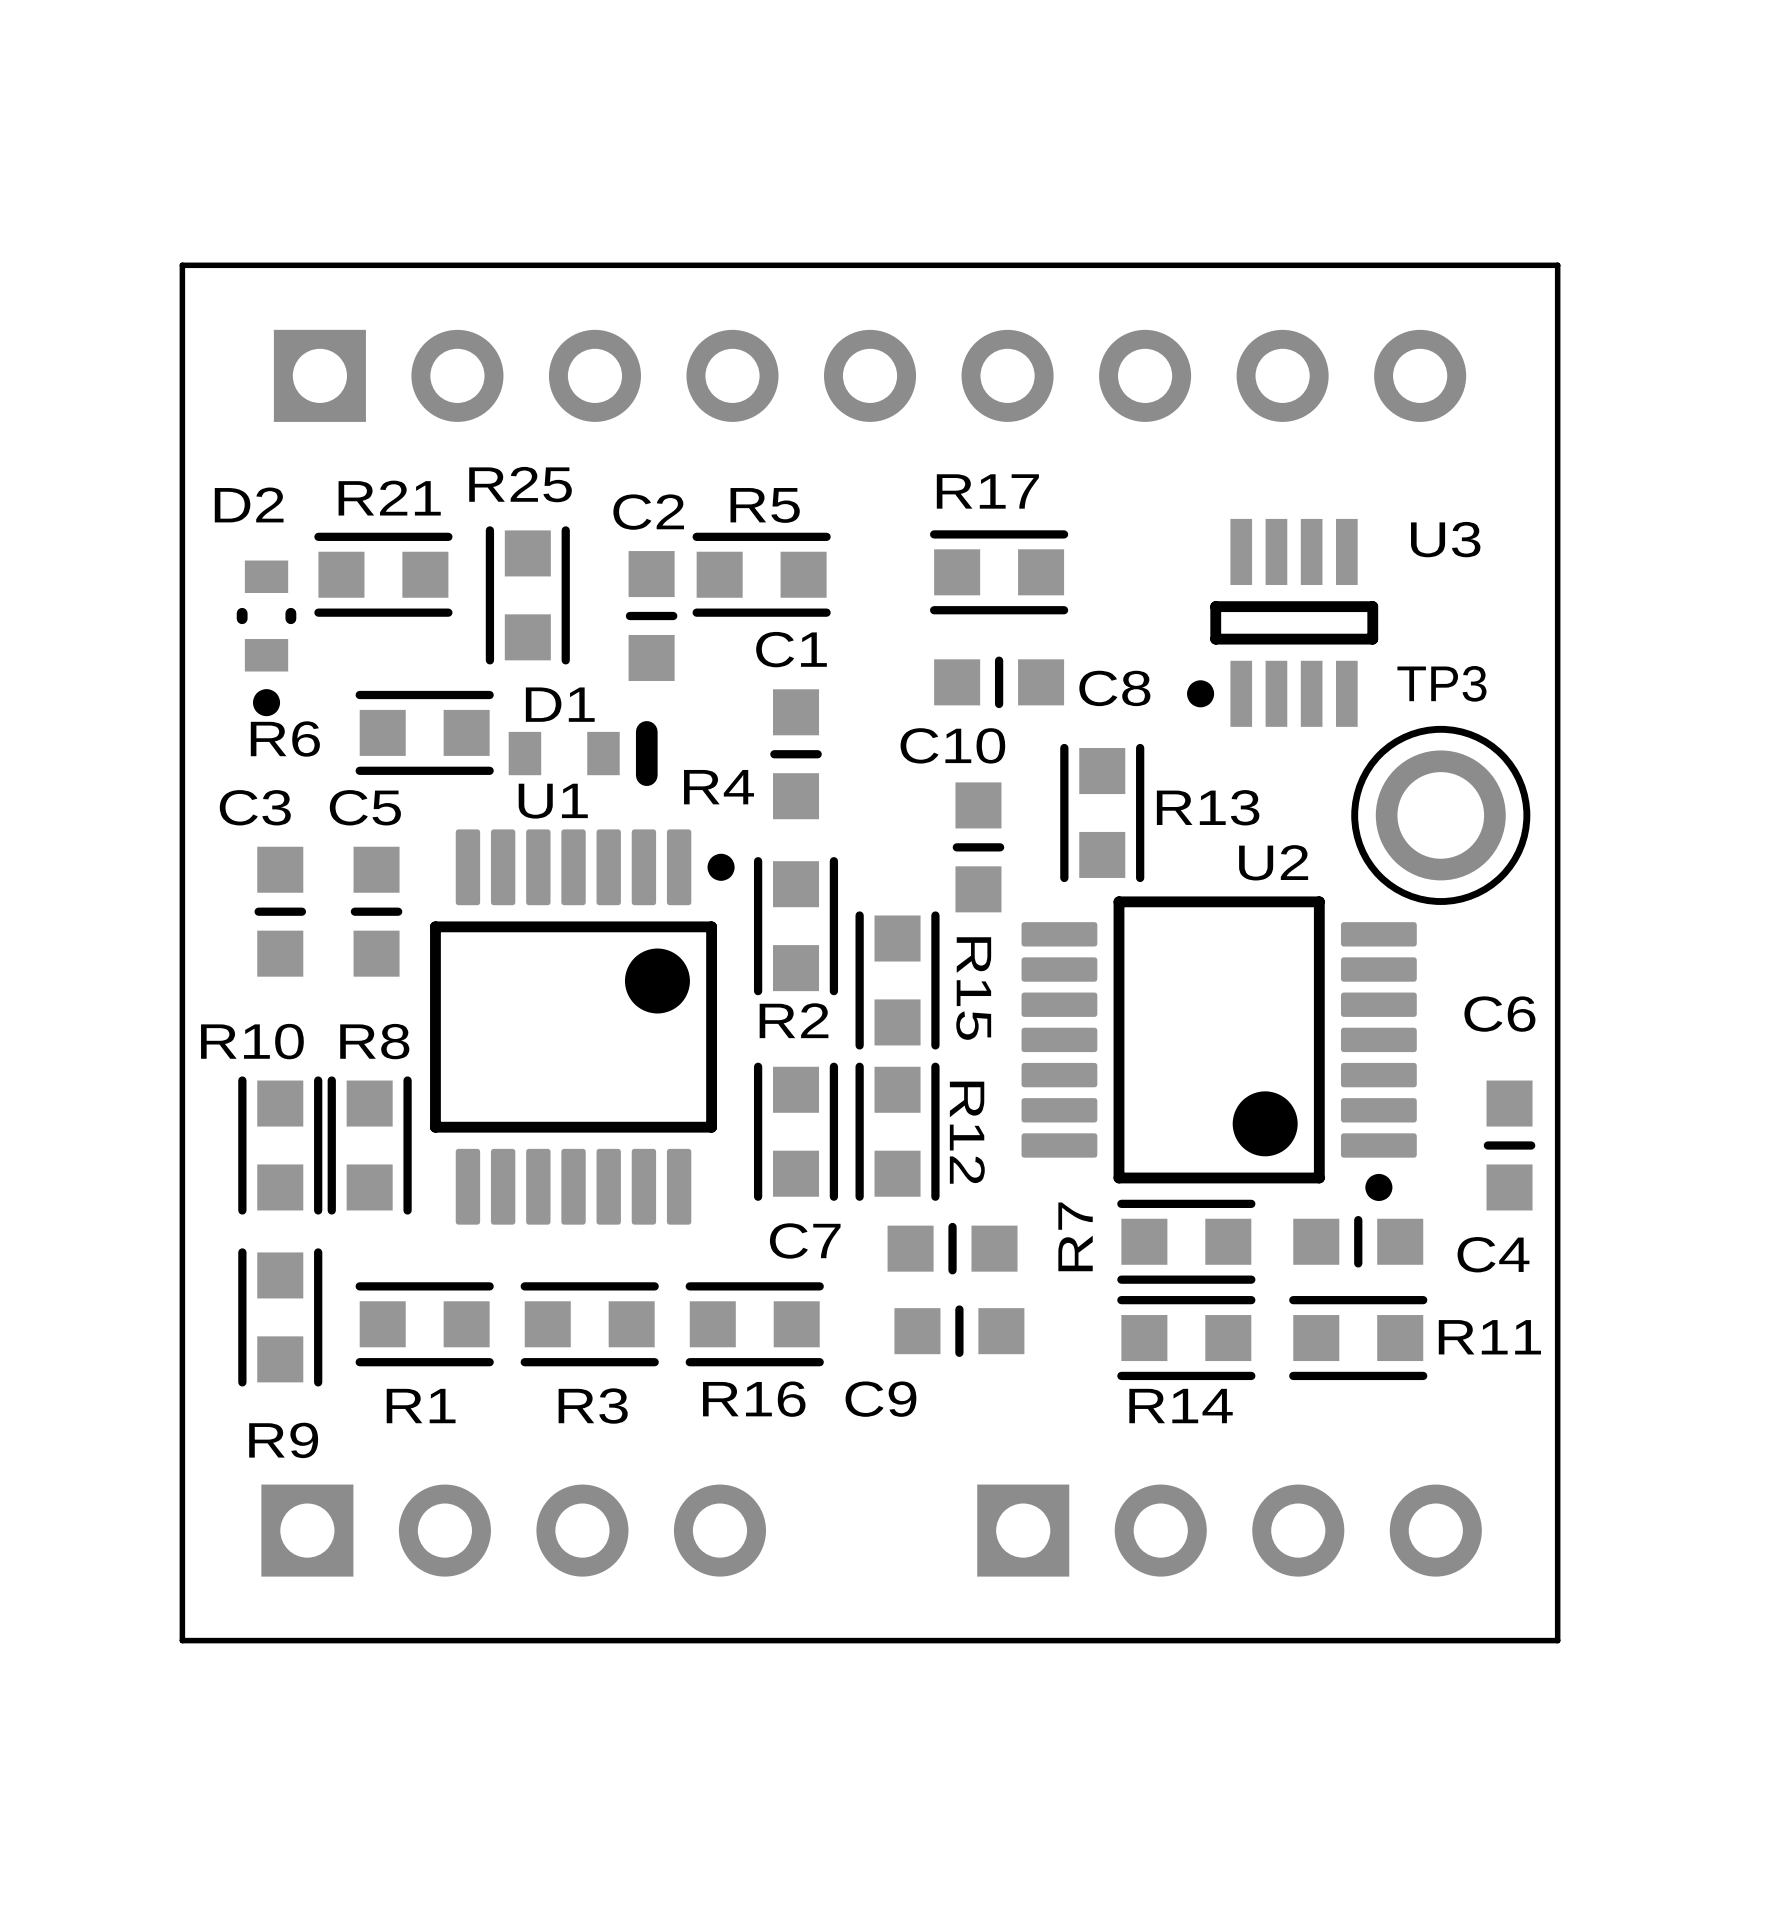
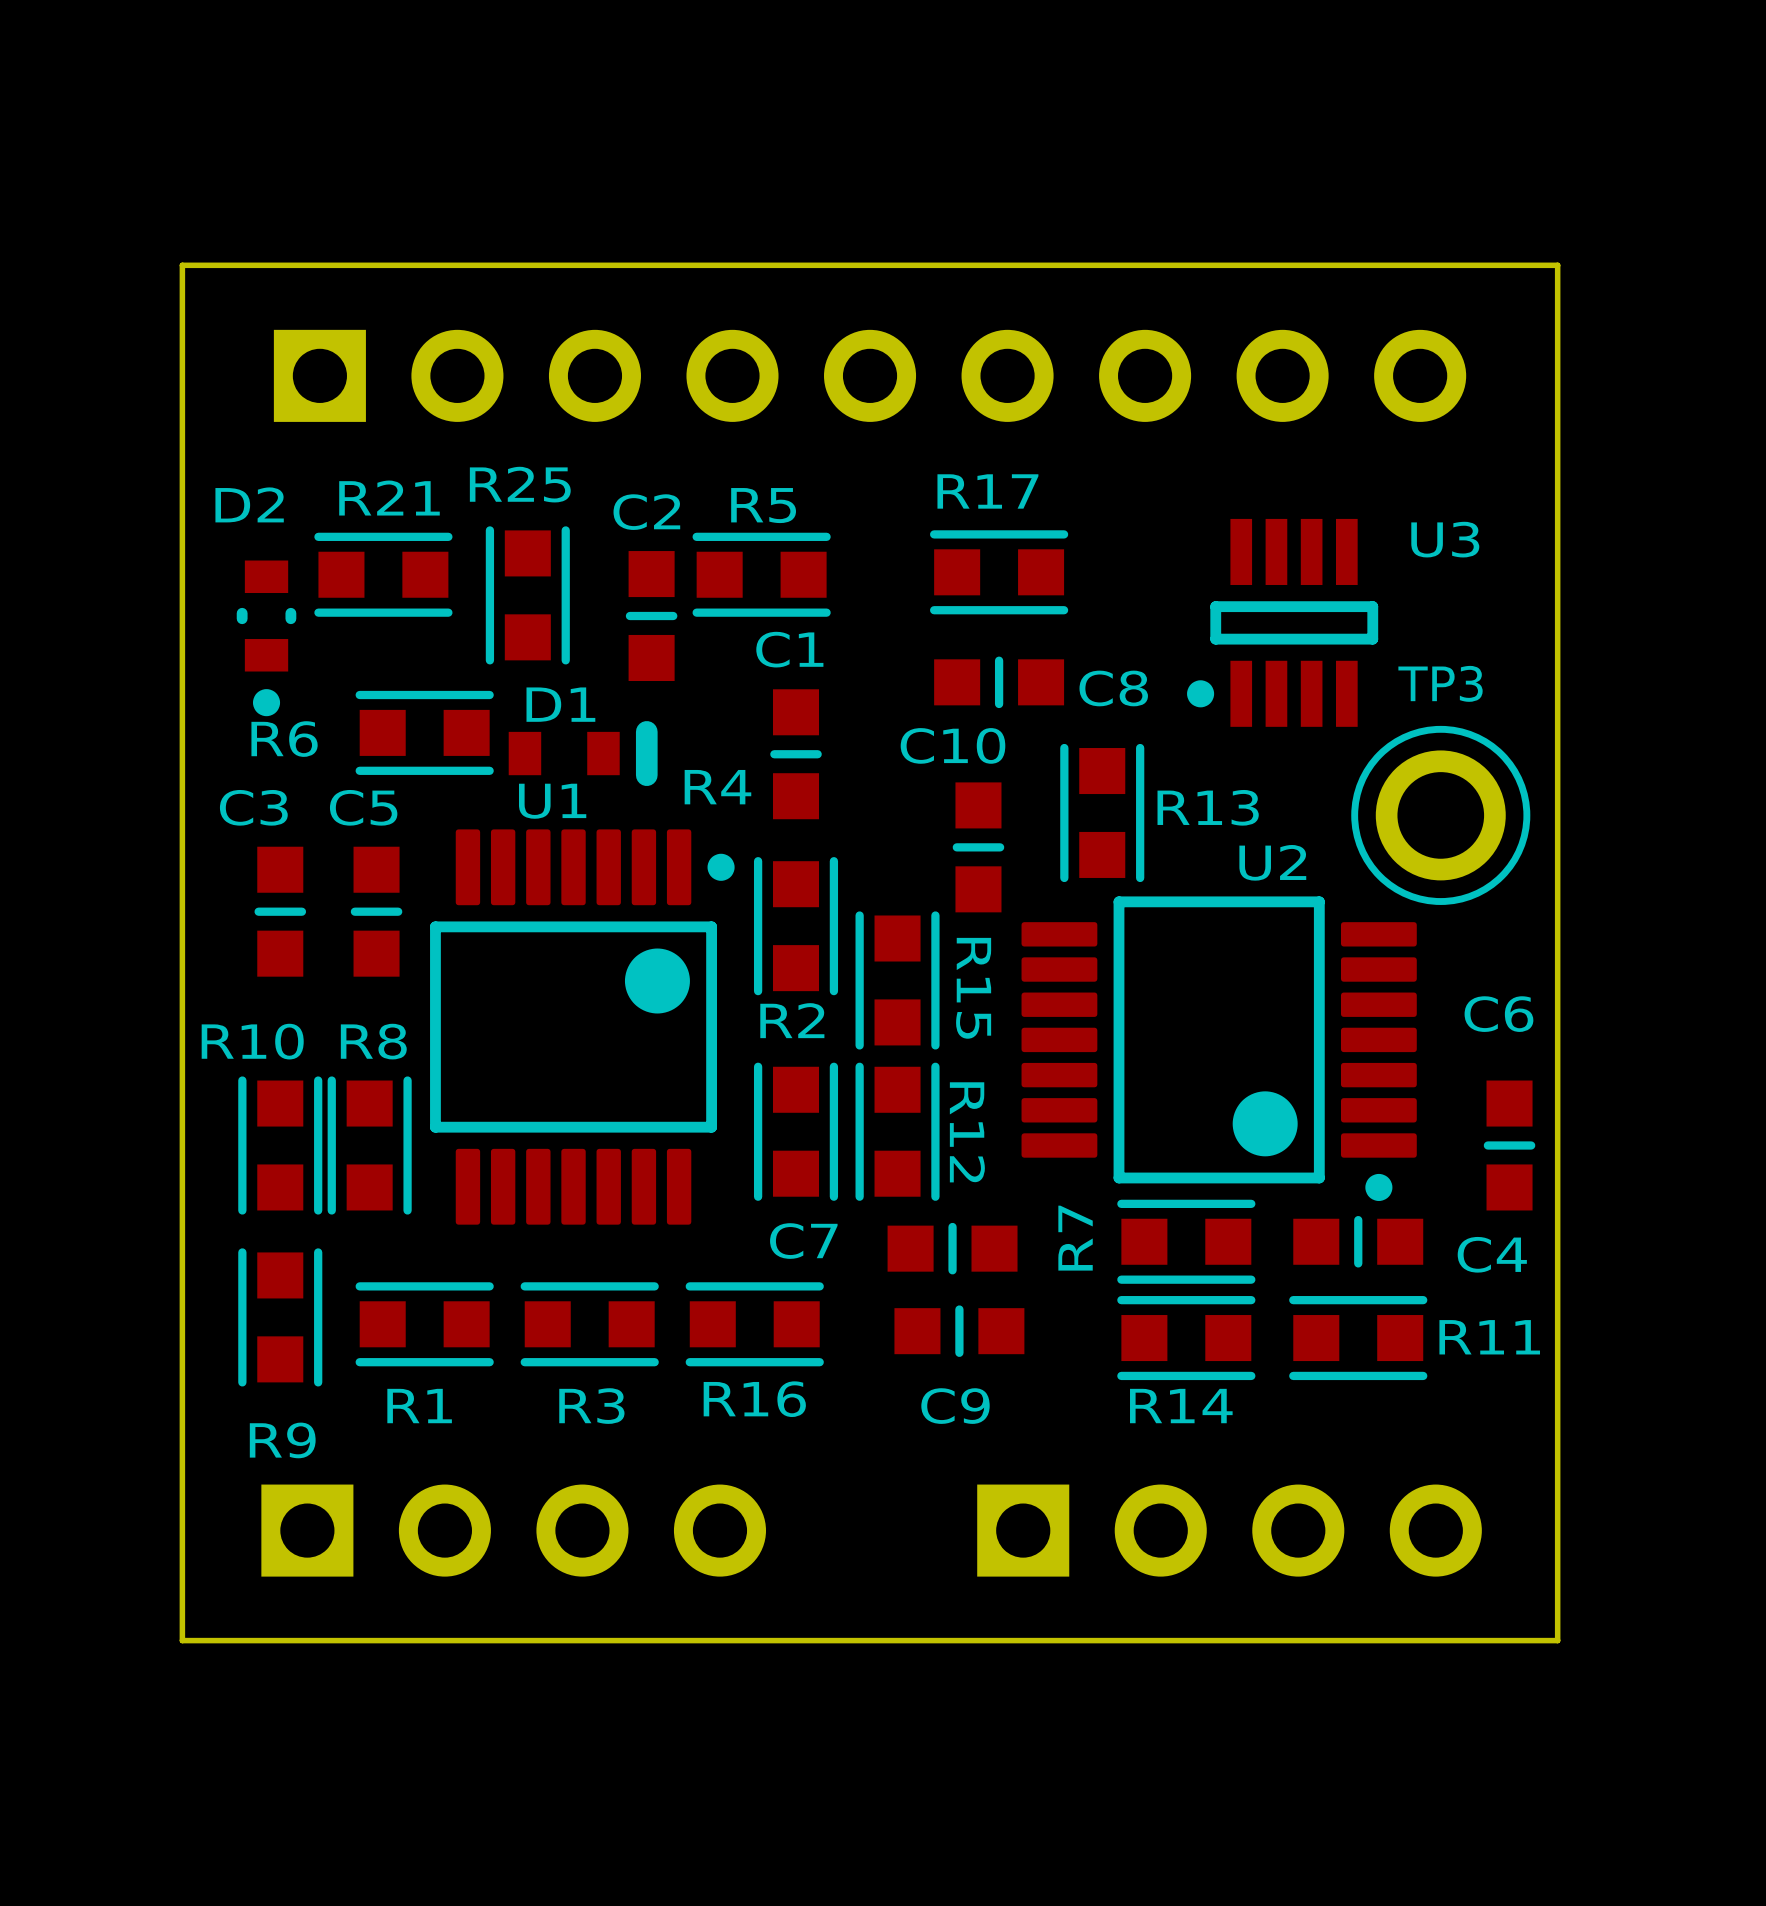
C9 name position: C9 (880, 1399) -> C9 (955, 1406)

